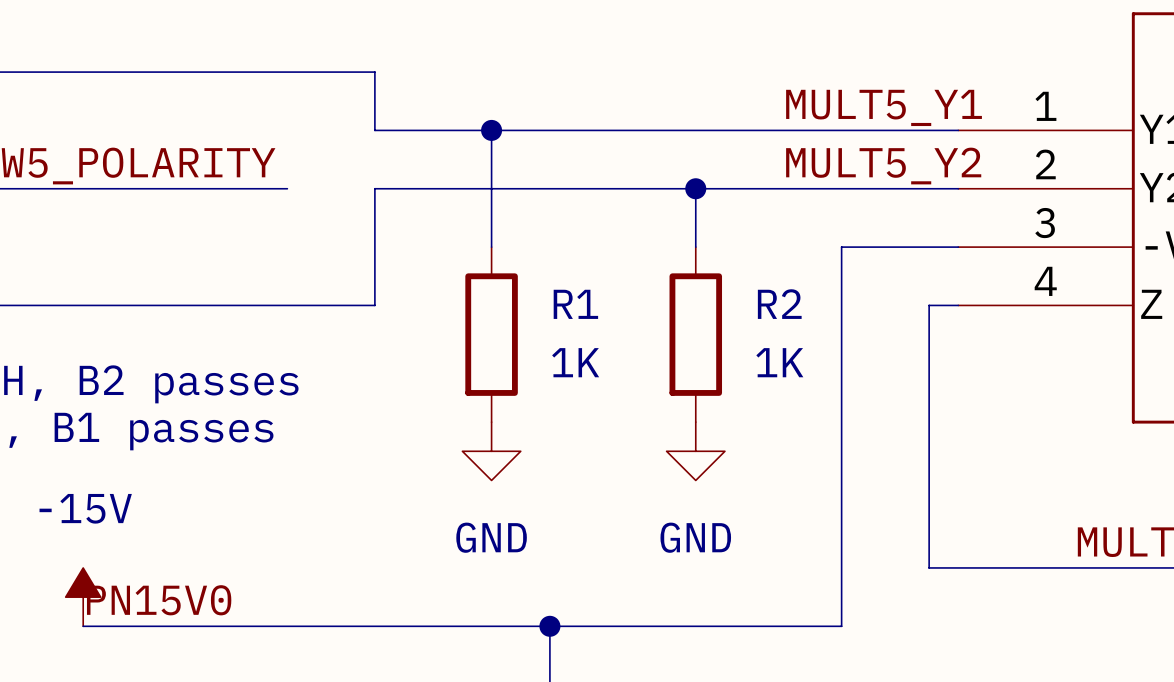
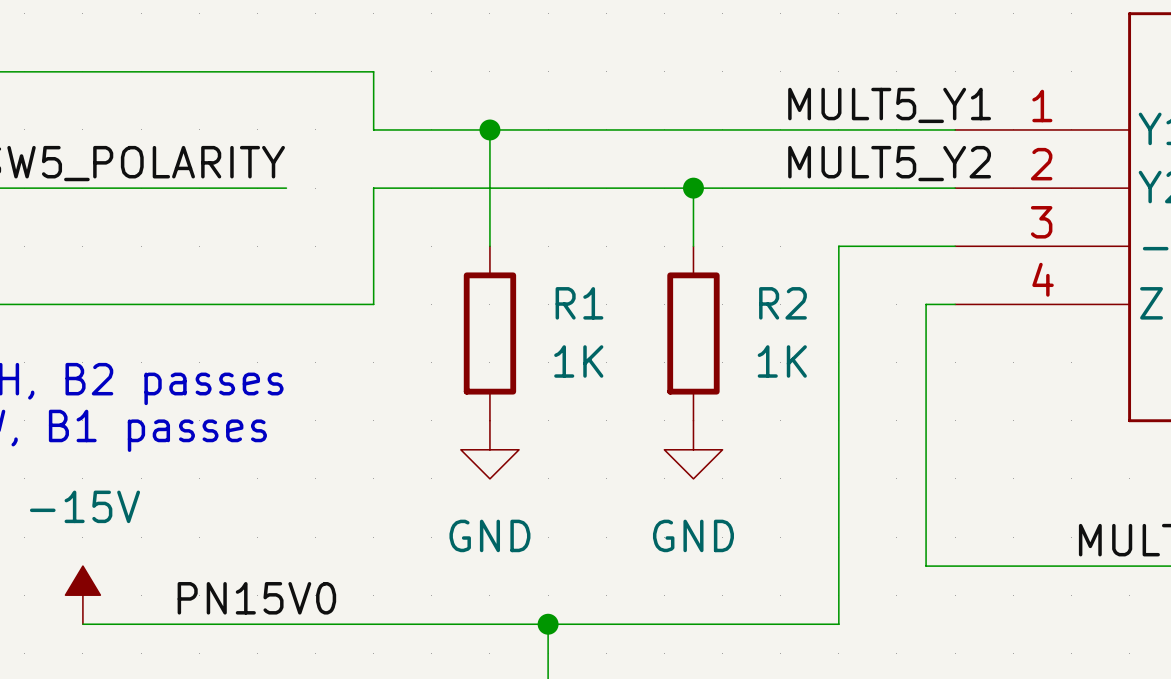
label position: PN15V0 (159, 600) -> PN15V0 (256, 598)

